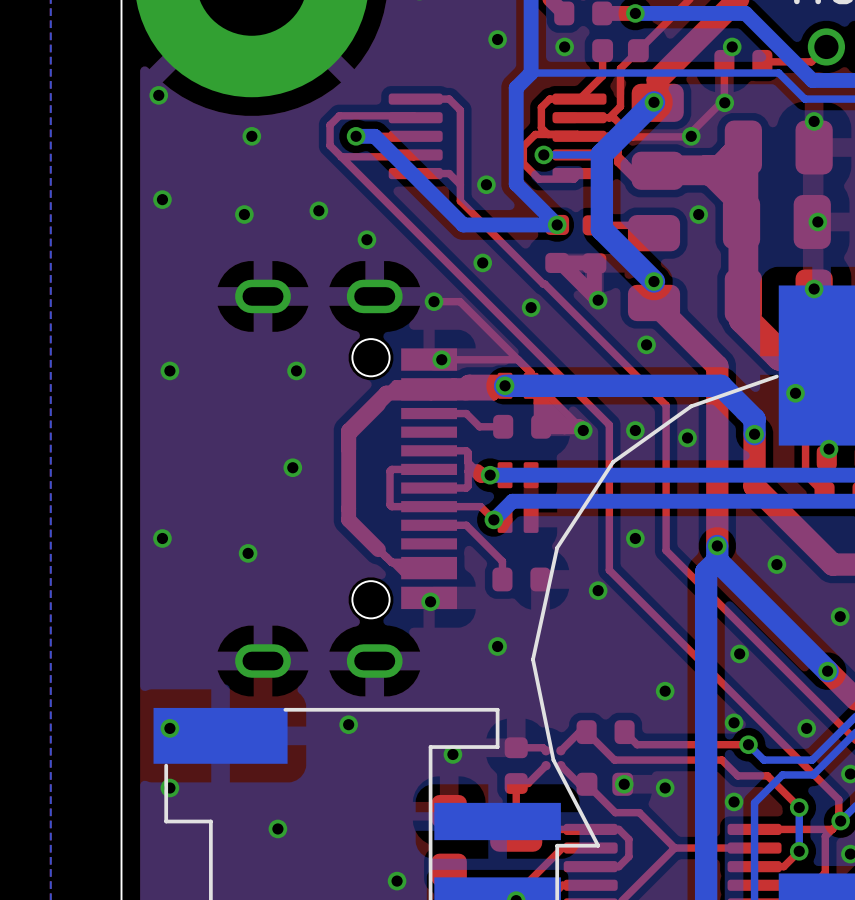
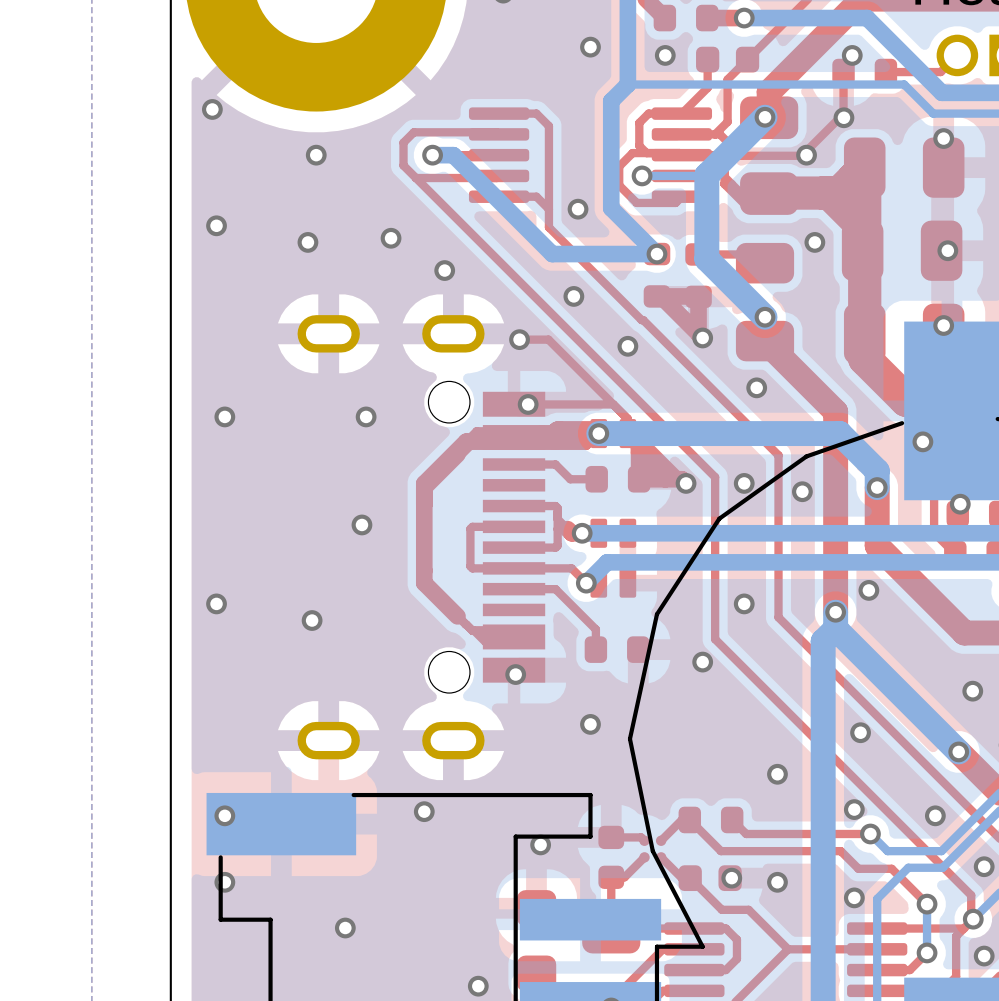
via position: (776, 564) -> (868, 590)

